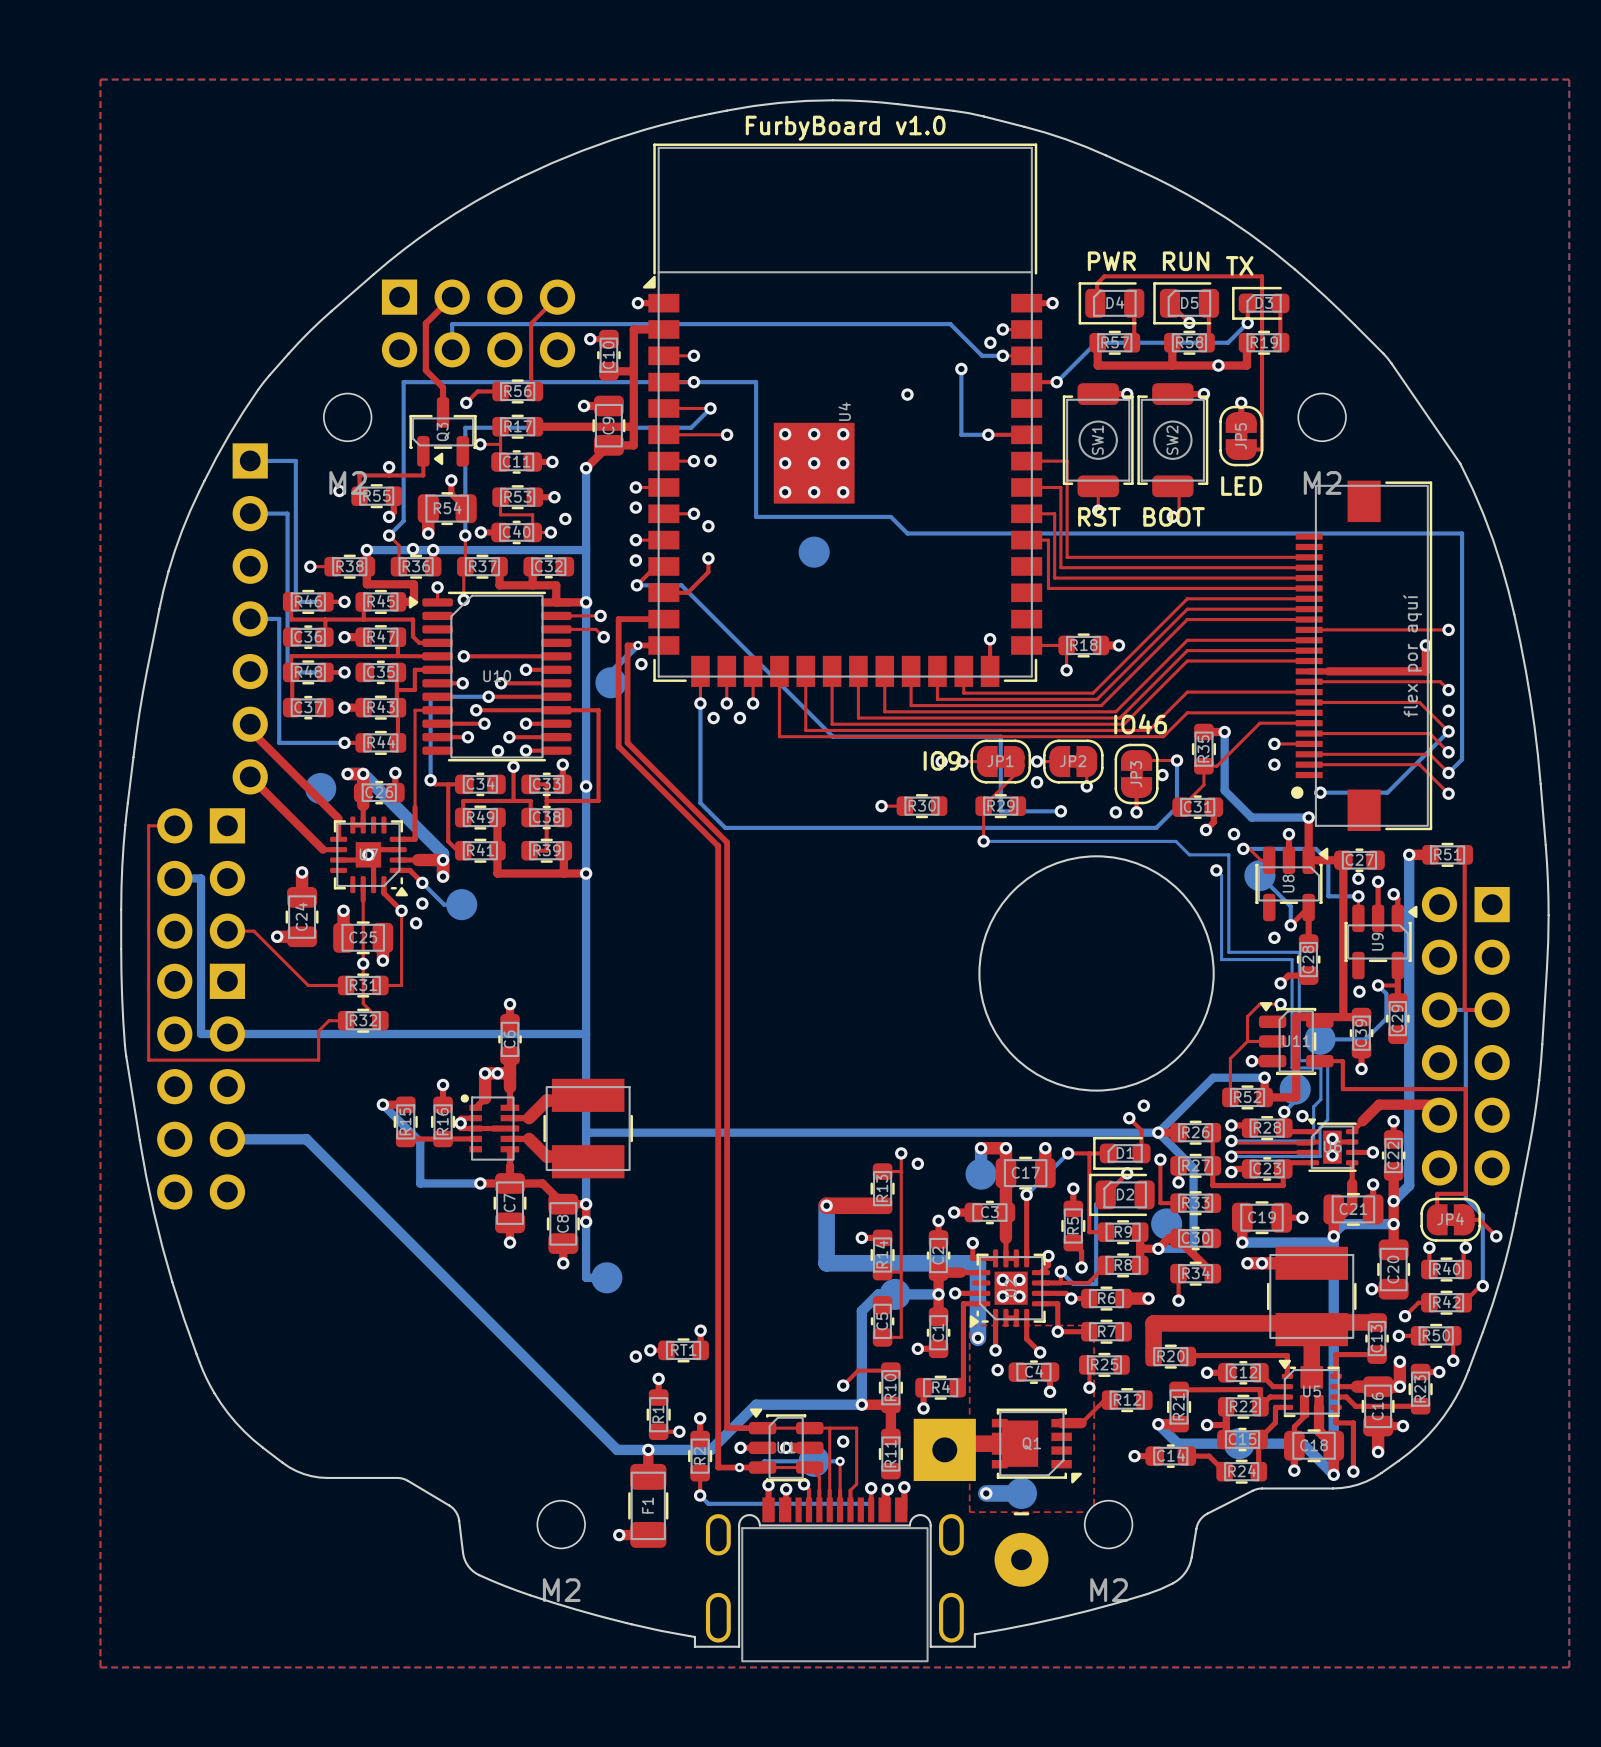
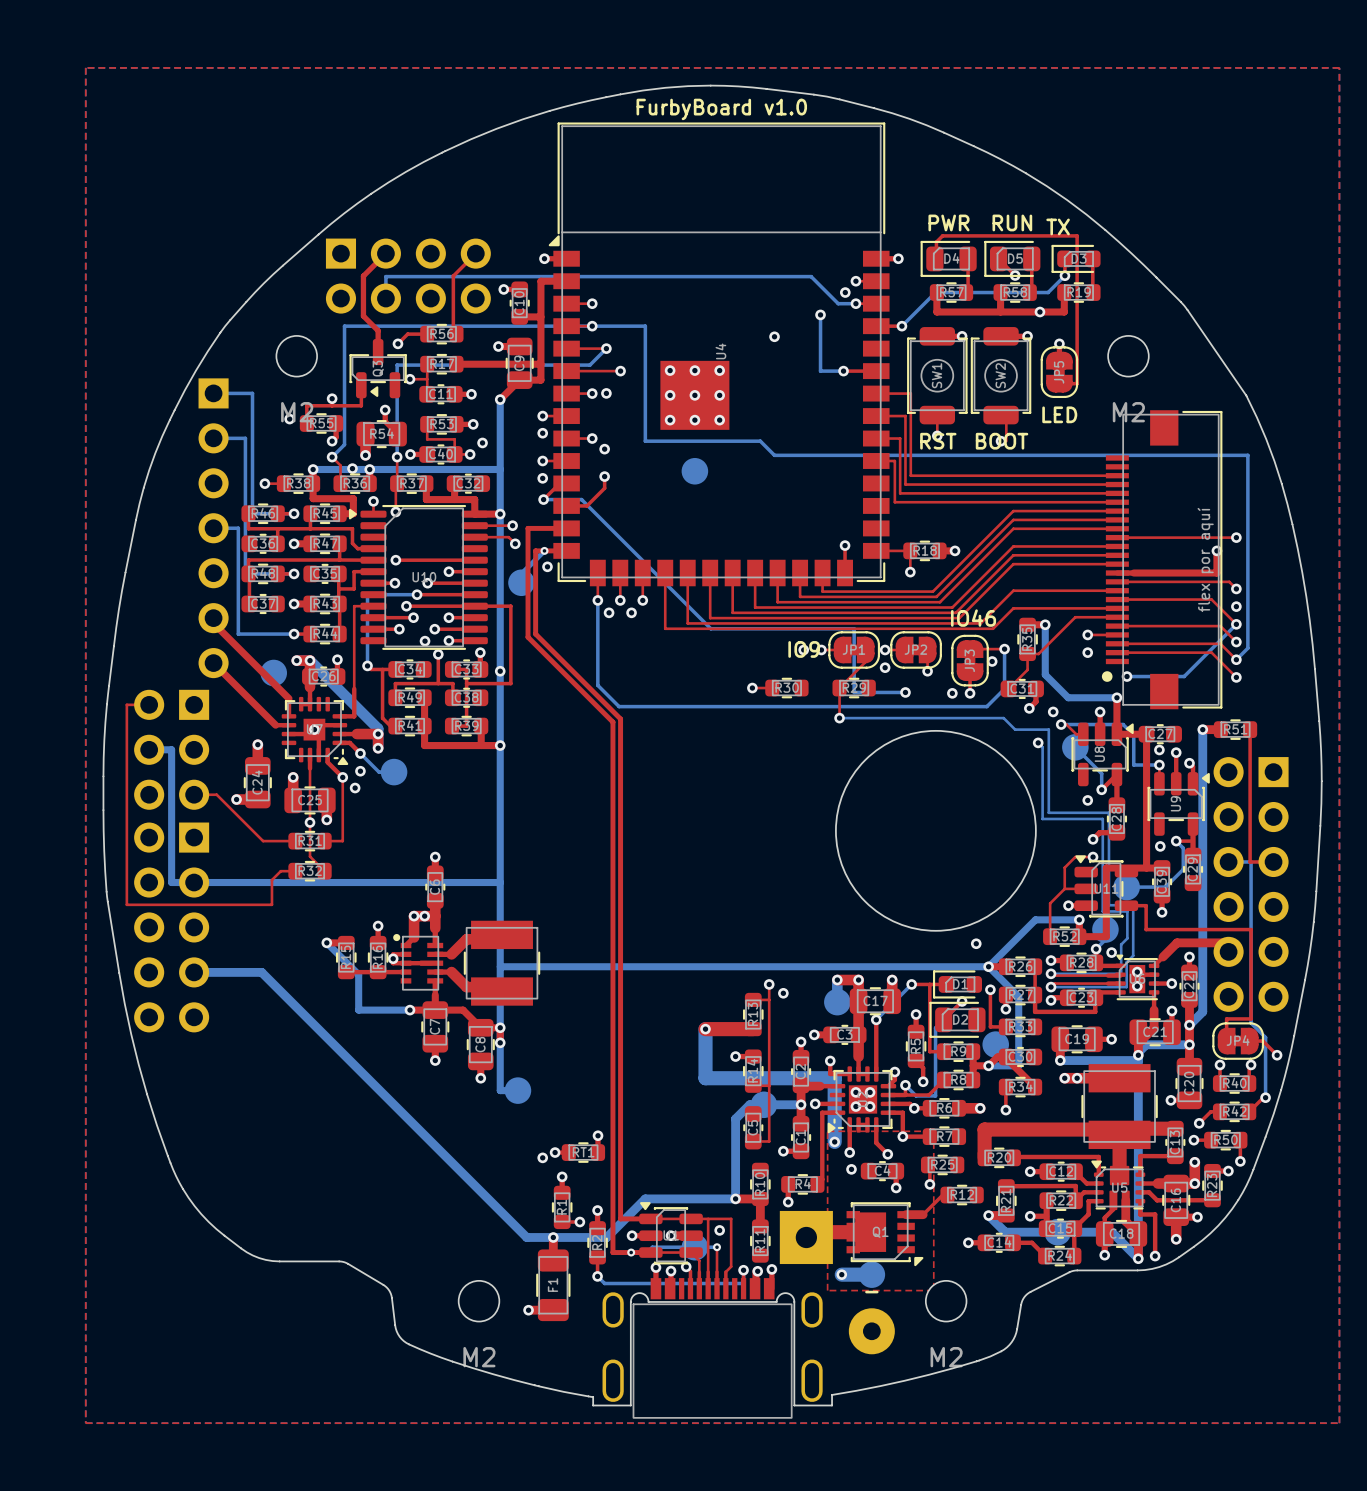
top track: (1129, 1118) (1141, 1130) (1141, 1153) -> none
via: (1129, 1118) -> none
top track: (890, 1370) (858, 1370) (843, 1385) -> none
via: (843, 1385) -> none

